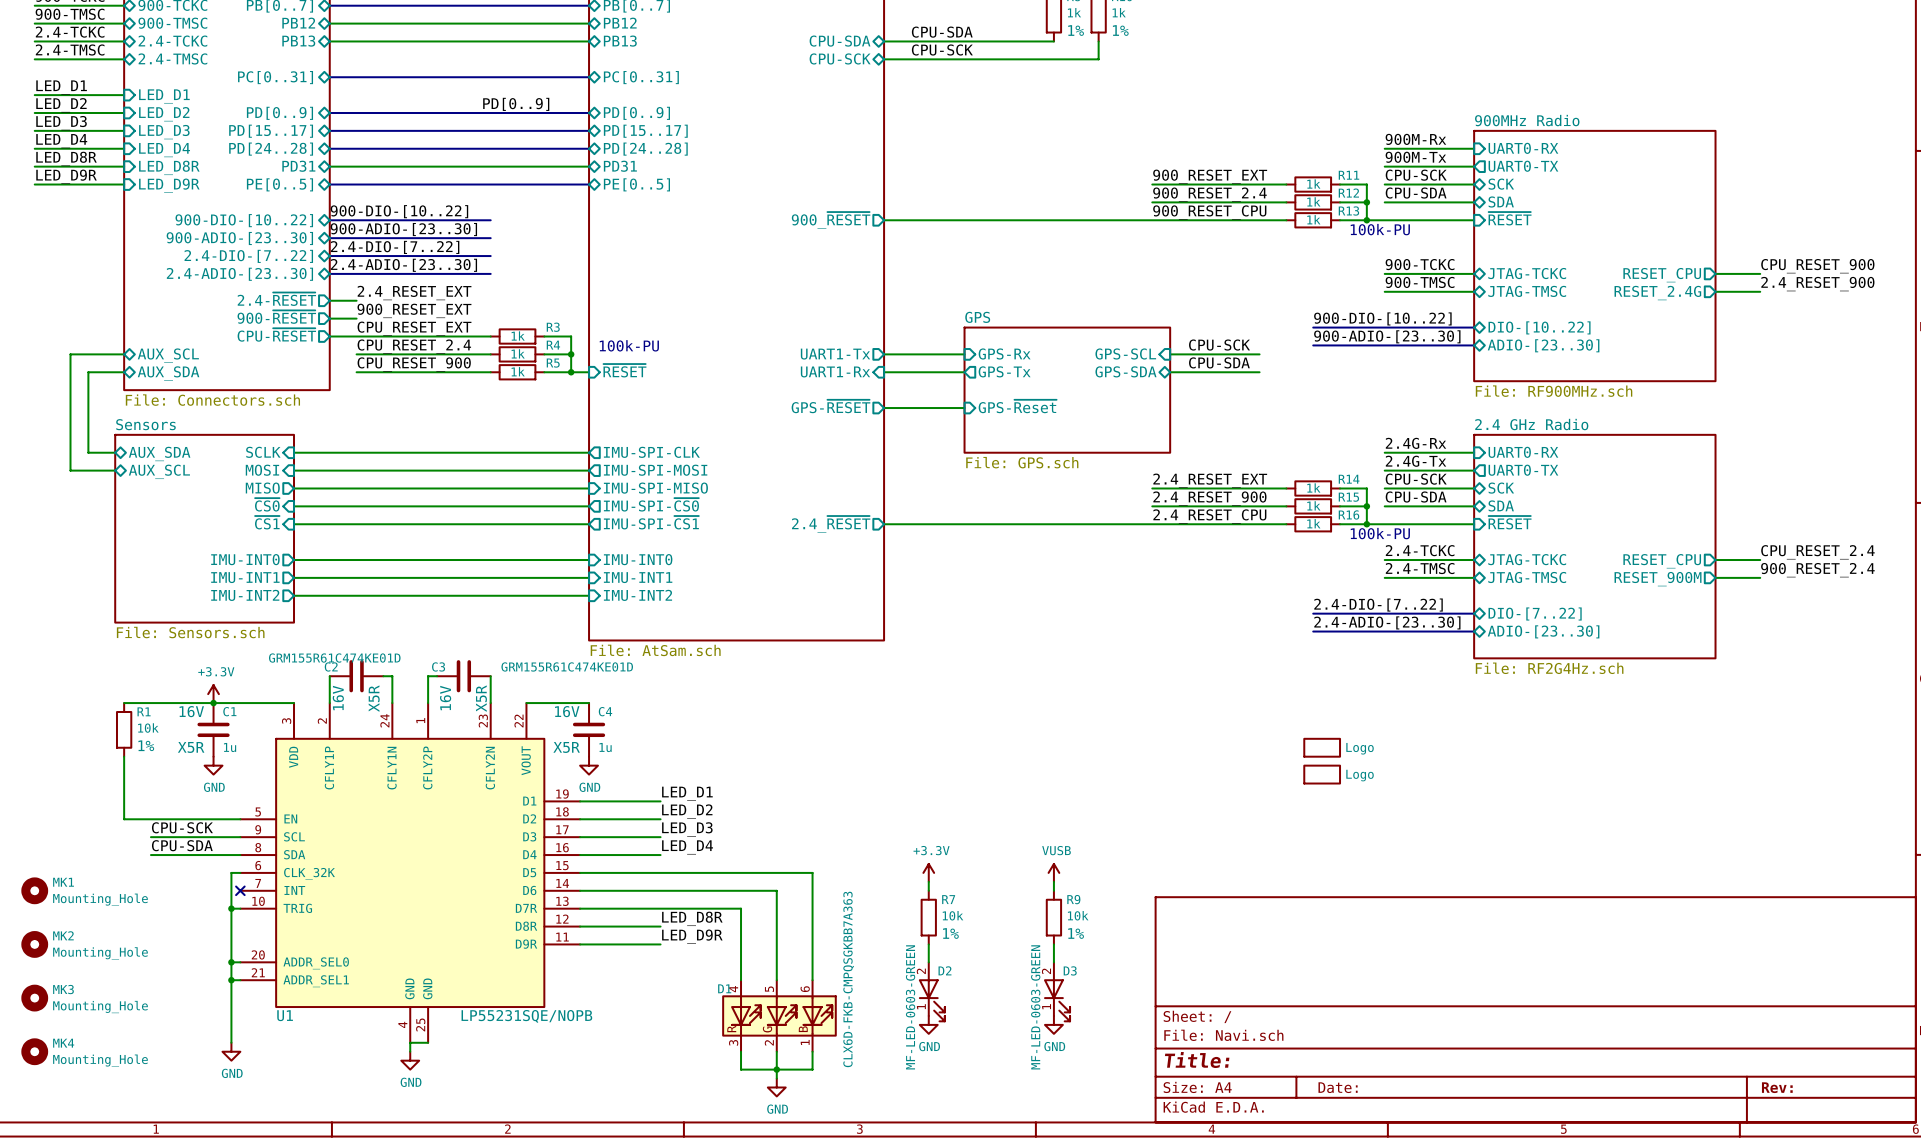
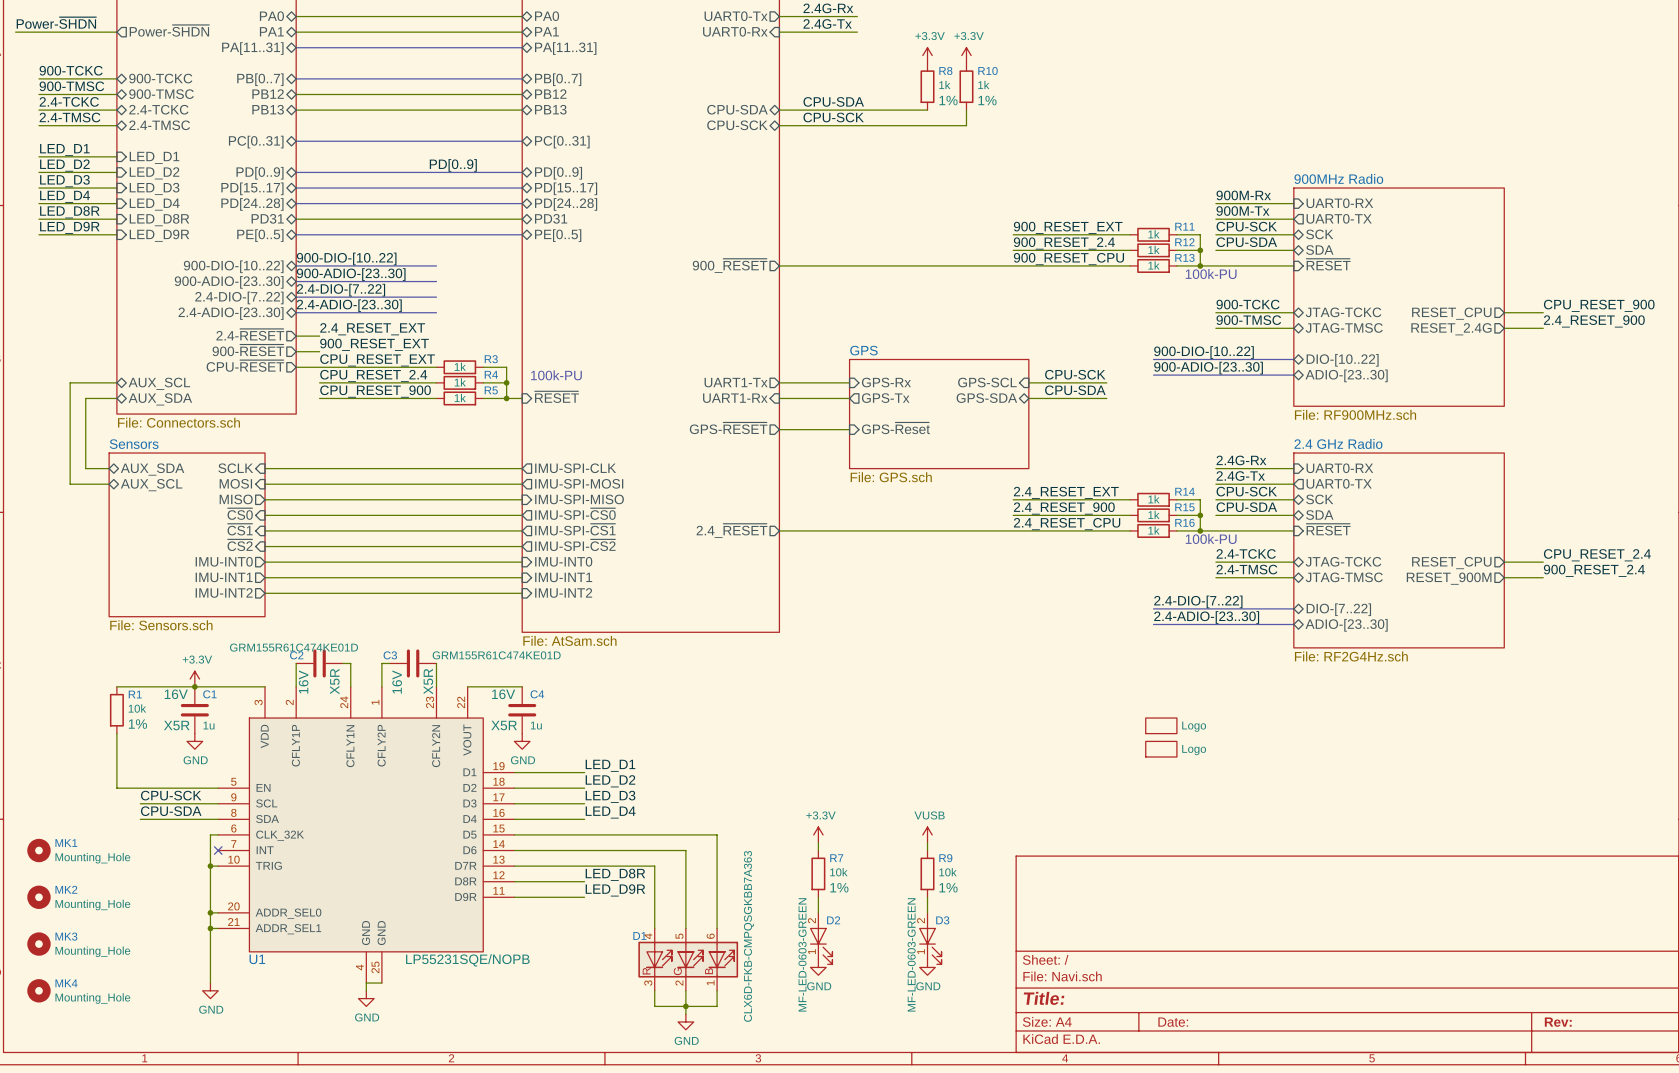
sheet pin: none -> ~{CS2} (240, 545)
sheet pin: none -> IMU-SPI-~{CS2} (575, 545)
wire: none -> (265, 546) (522, 546)

